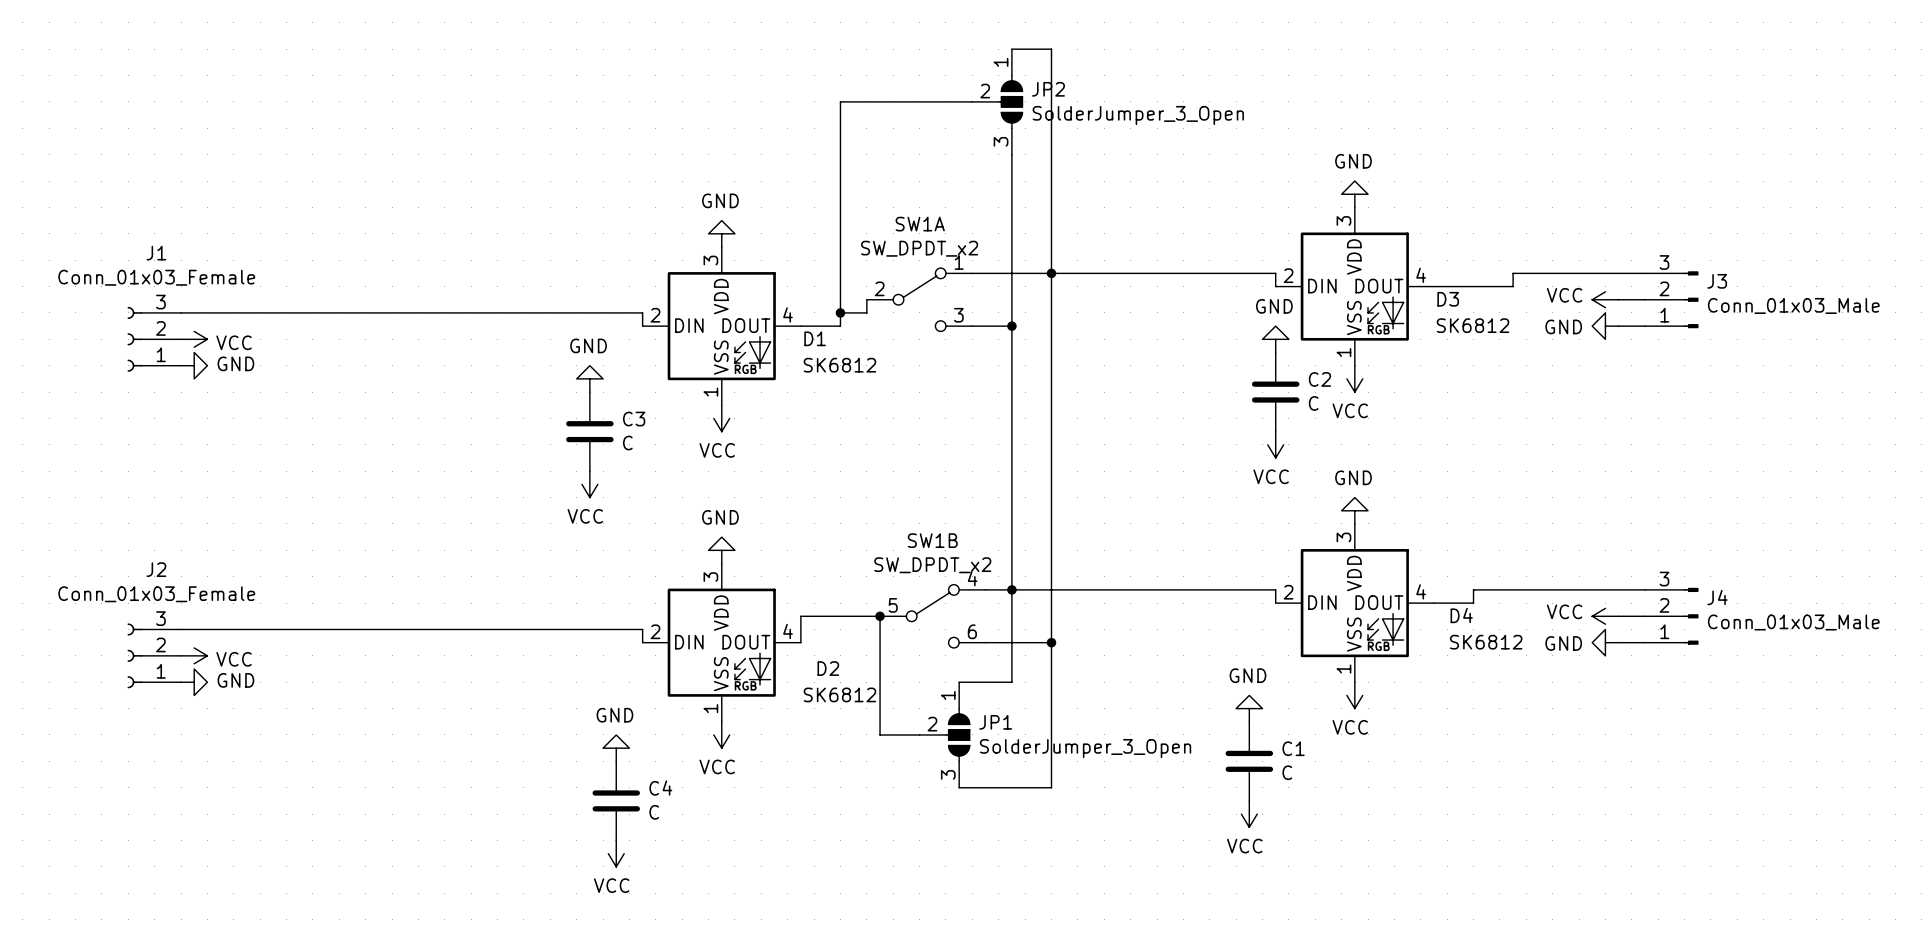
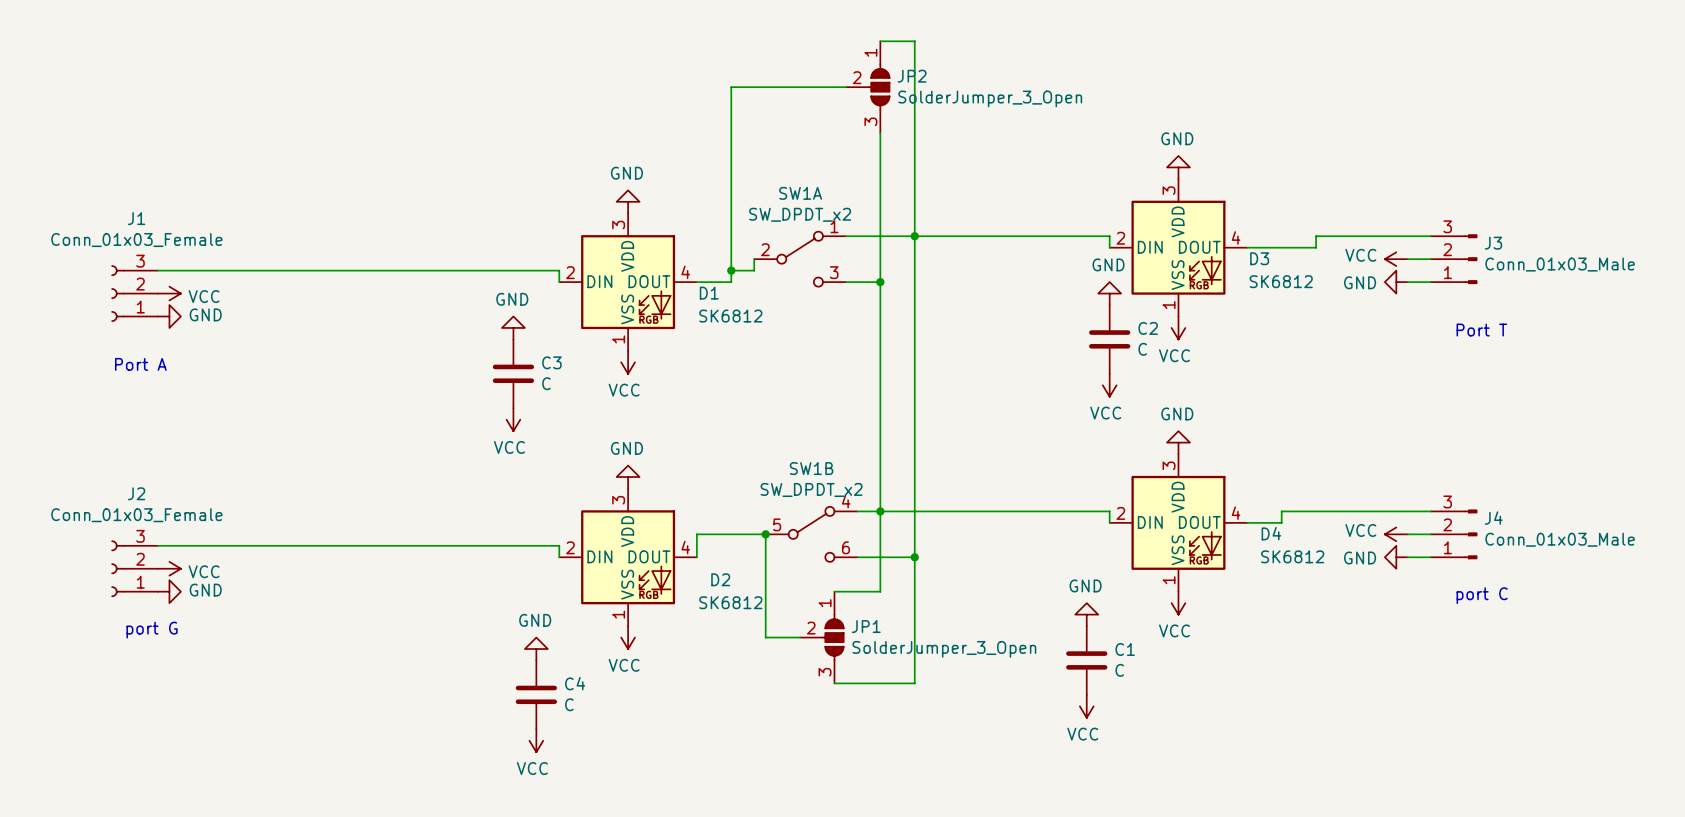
text: none -> Port T (1481, 330)
text: none -> Port A (140, 364)
text: none -> port C (1482, 595)
text: none -> port G (152, 630)

